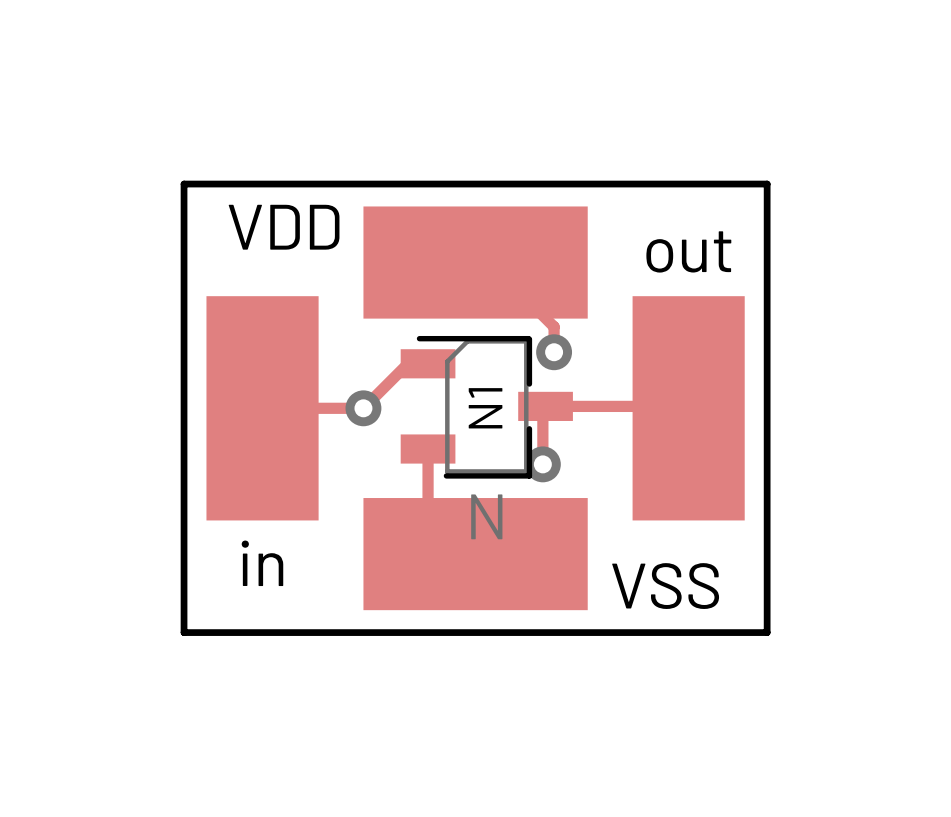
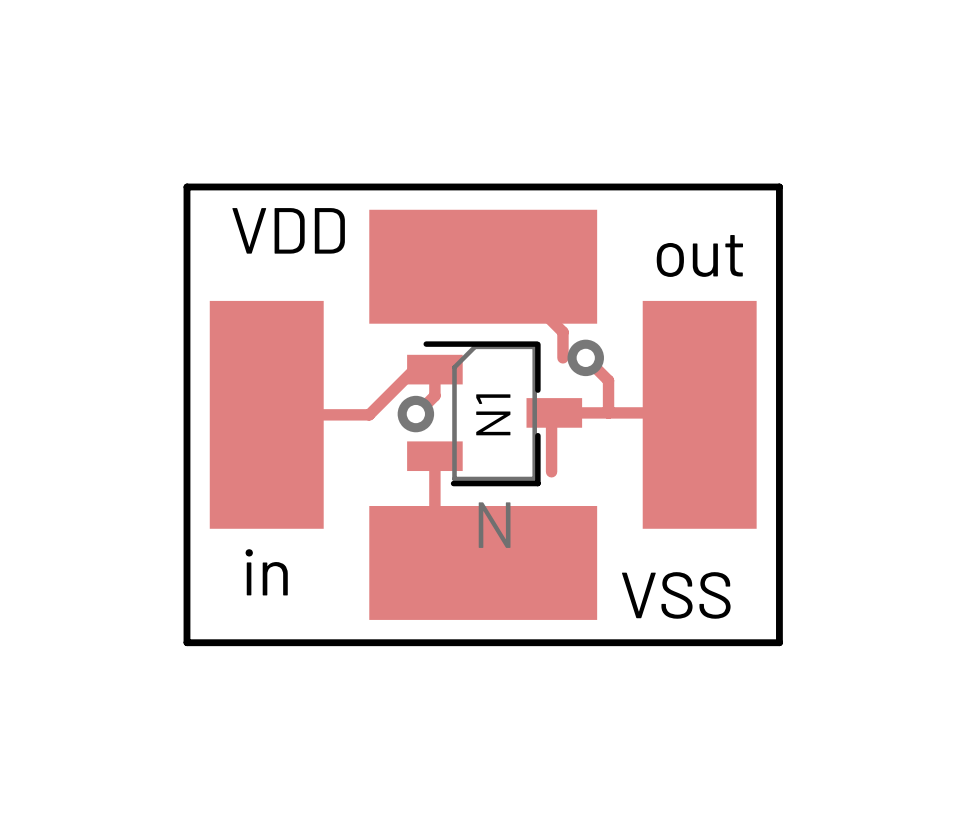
via position: (554, 352) -> (585, 357)
track: none -> (585, 357) (608, 380) (608, 412)
track: none -> (434, 369) (434, 395) (427, 403)
via position: (363, 408) -> (415, 414)
via: (542, 464) -> none

